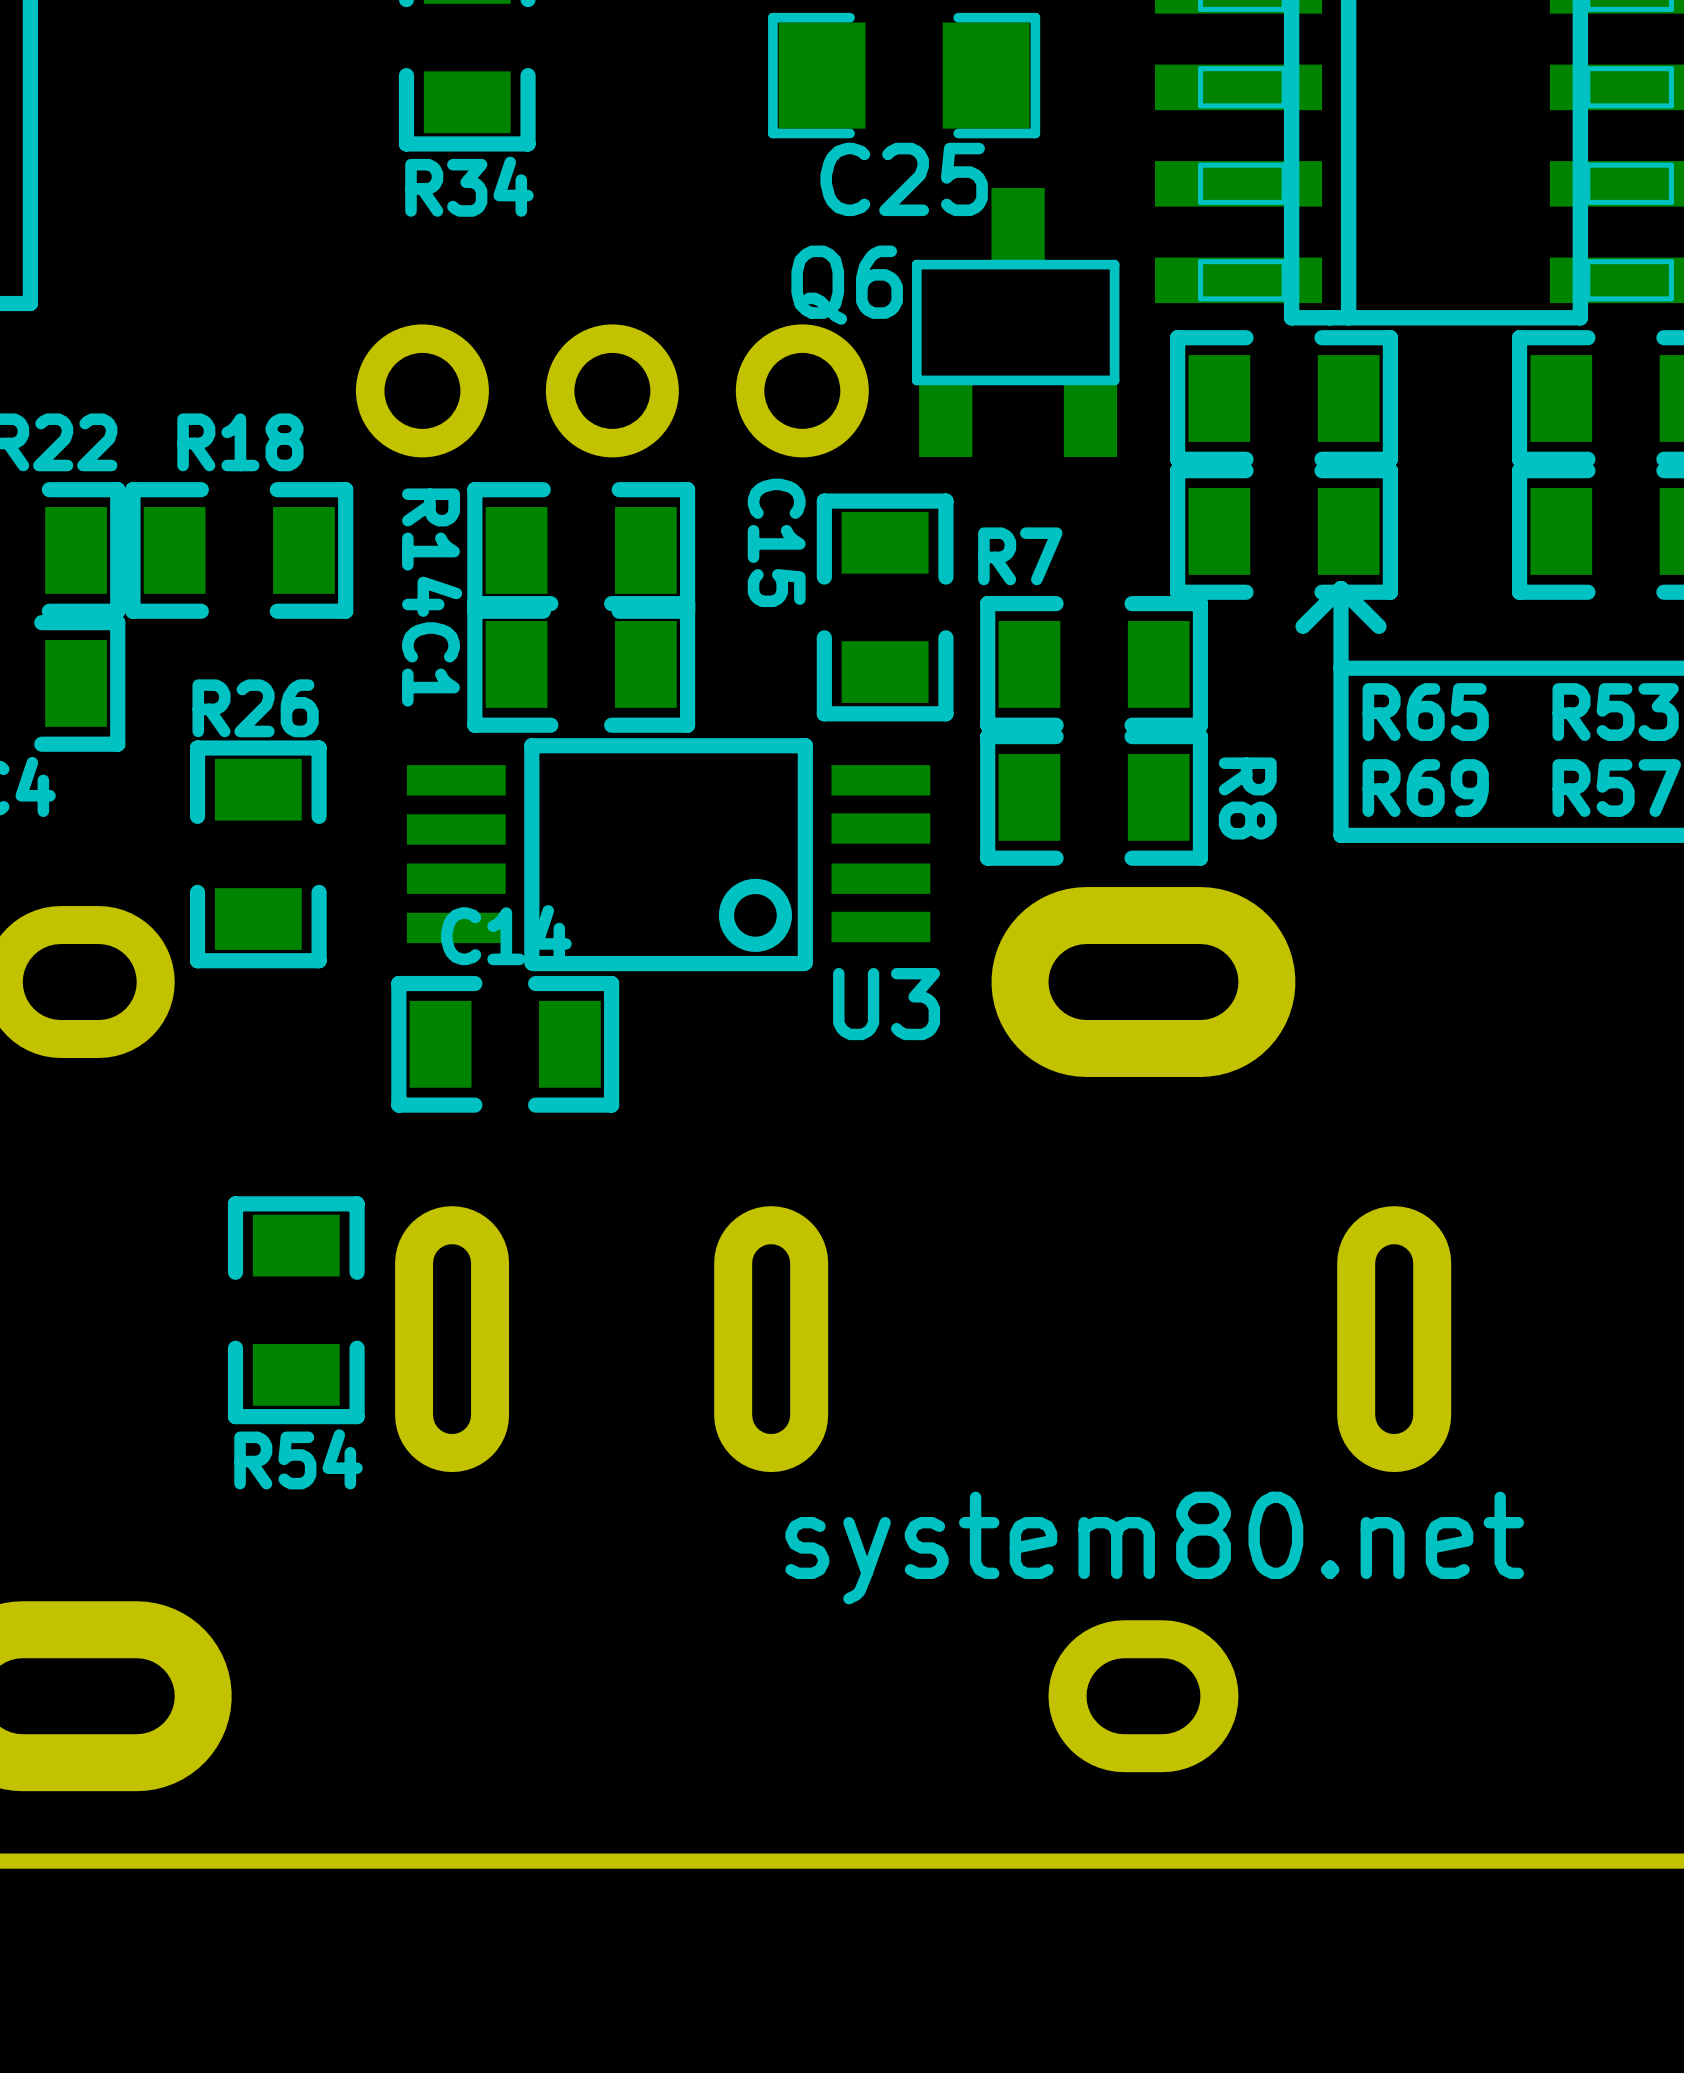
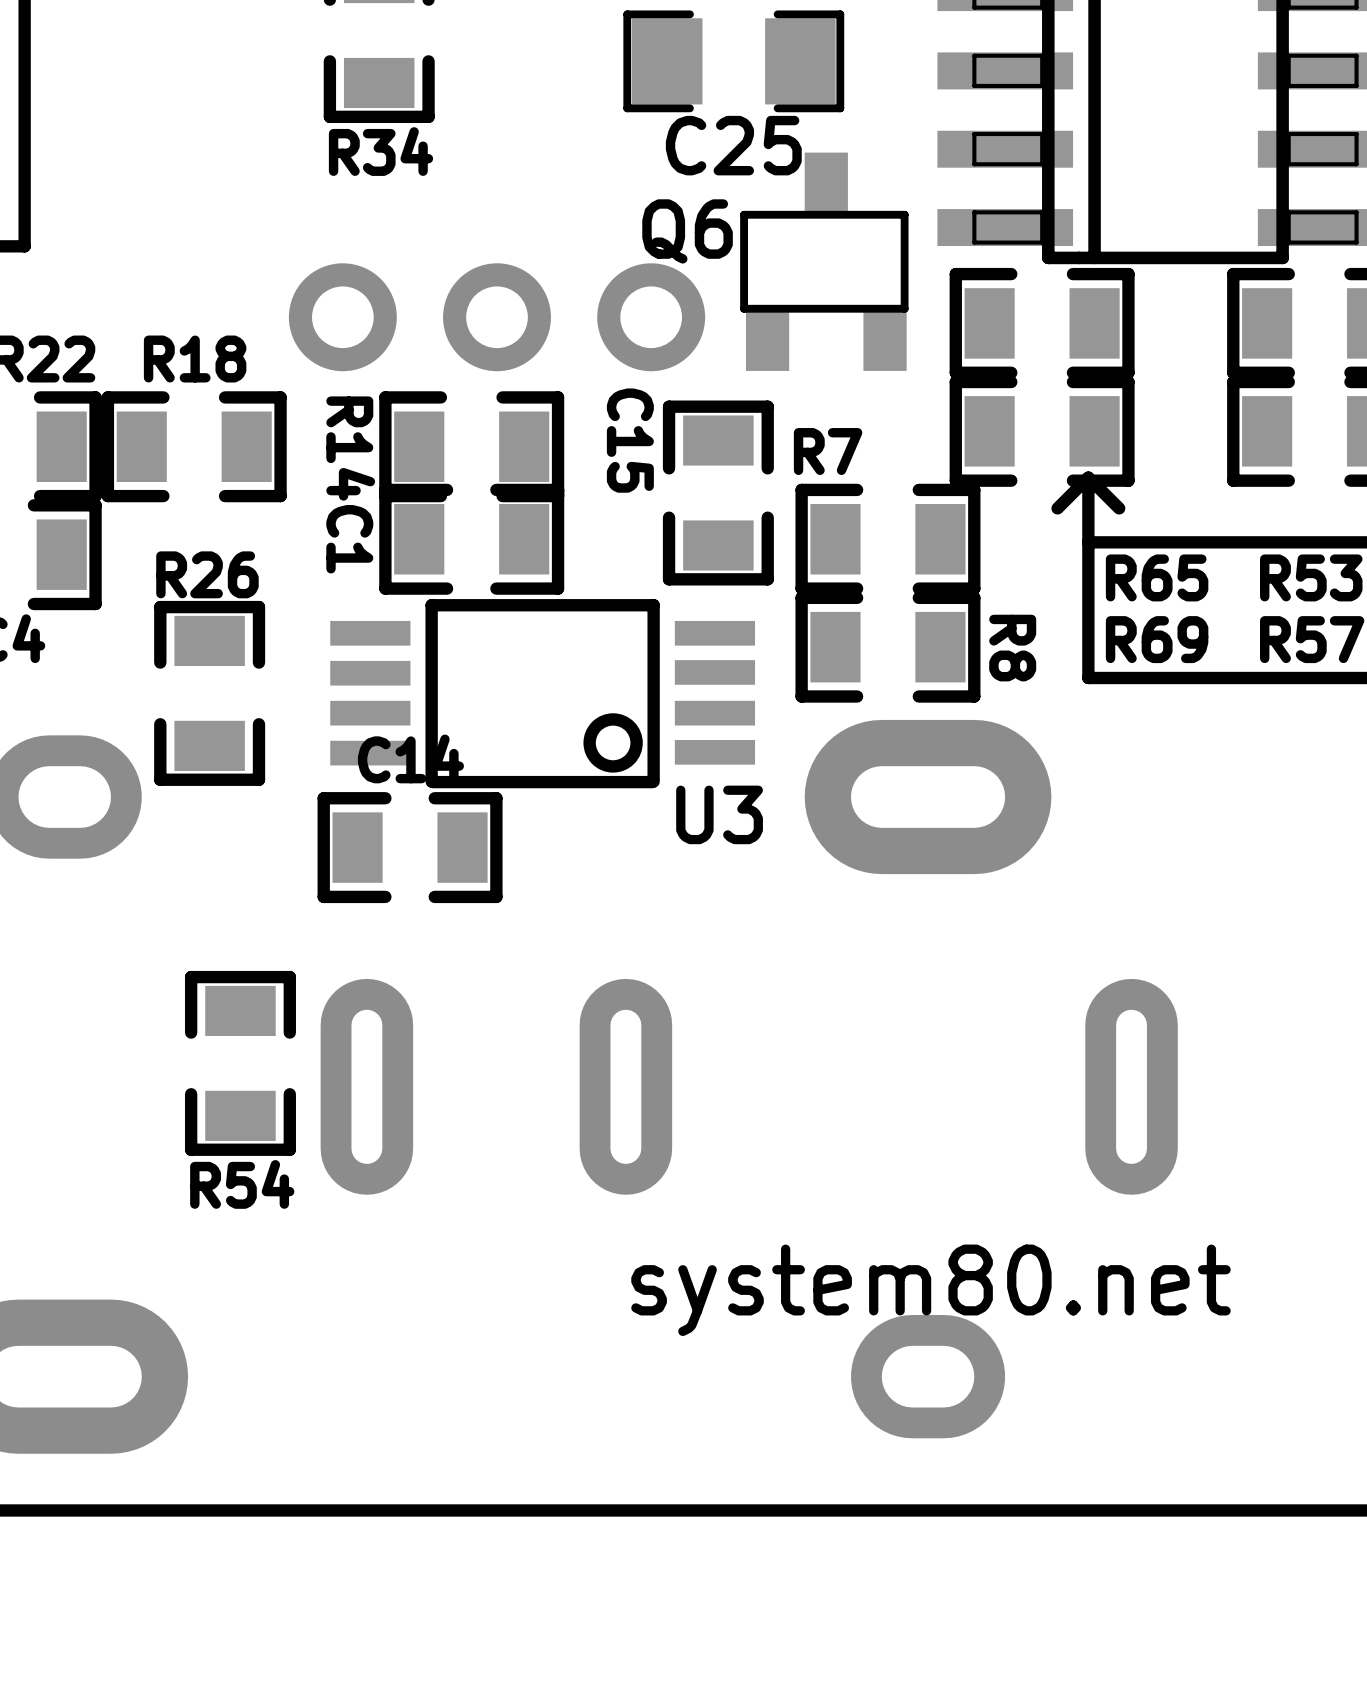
text position: system80.net (1154, 1548) -> system80.net (930, 1290)

